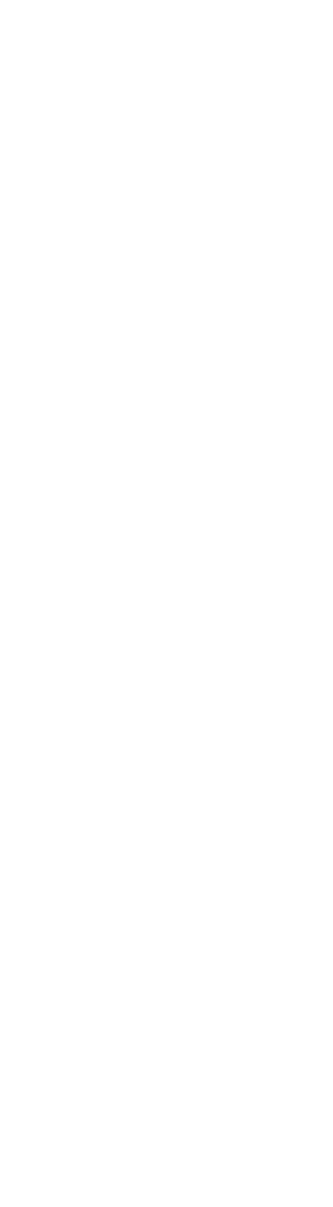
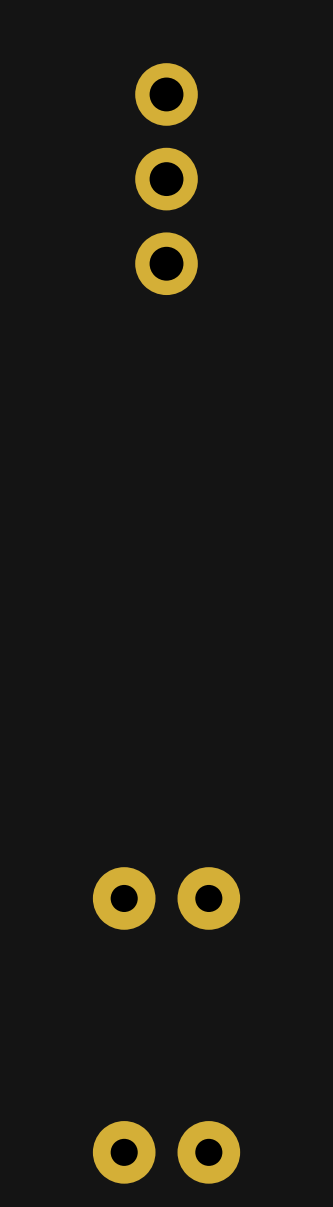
part: none -> (166, 179)
part: none -> (166, 898)
part: none -> (166, 1152)

